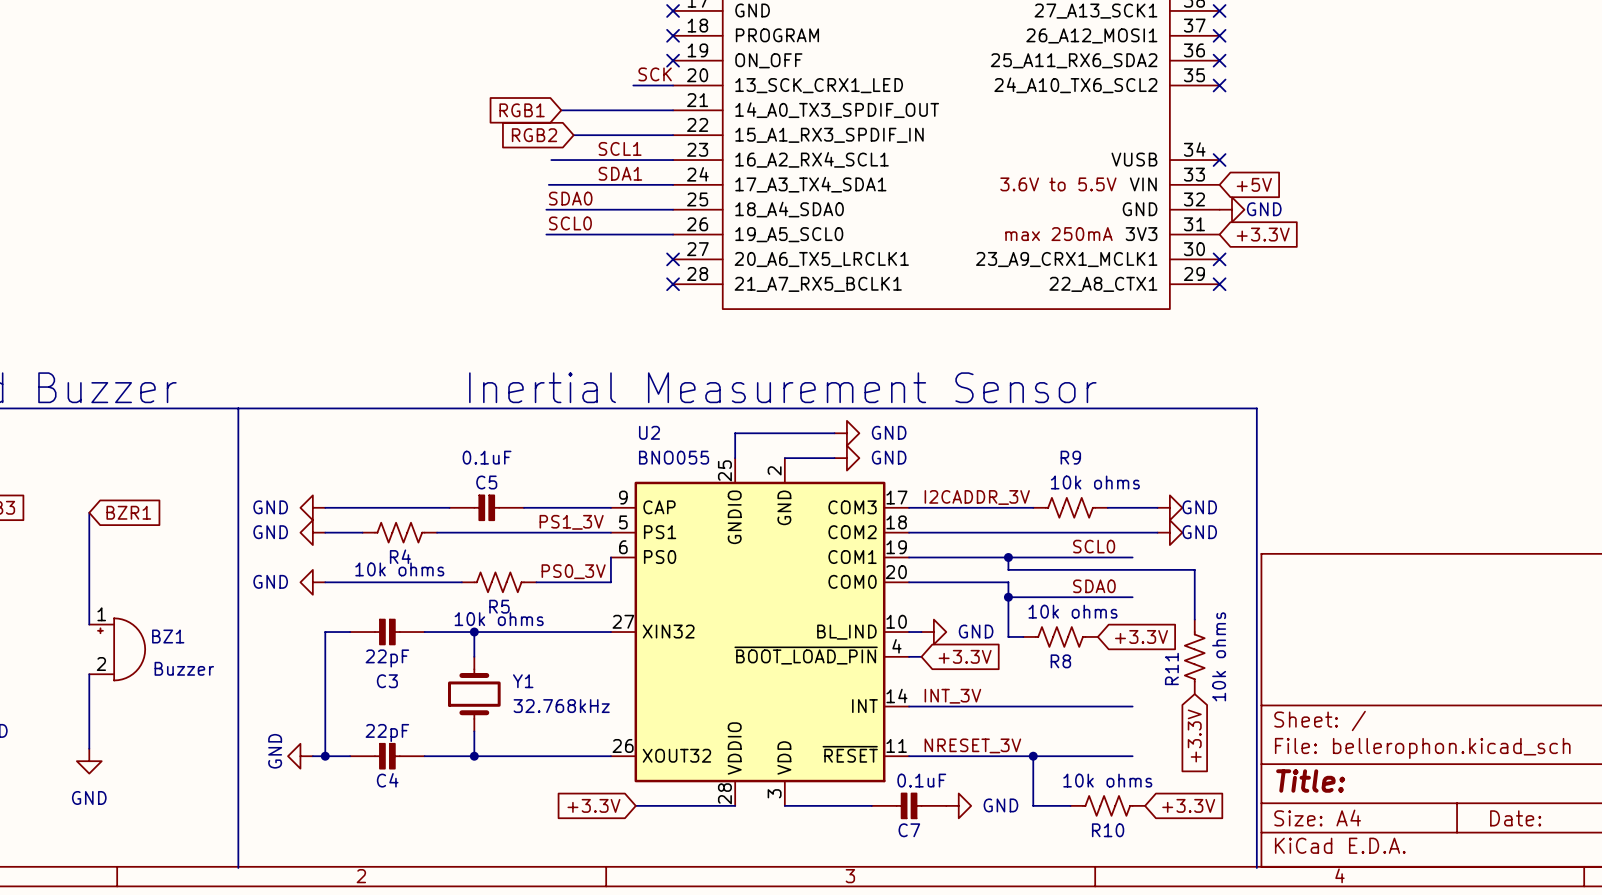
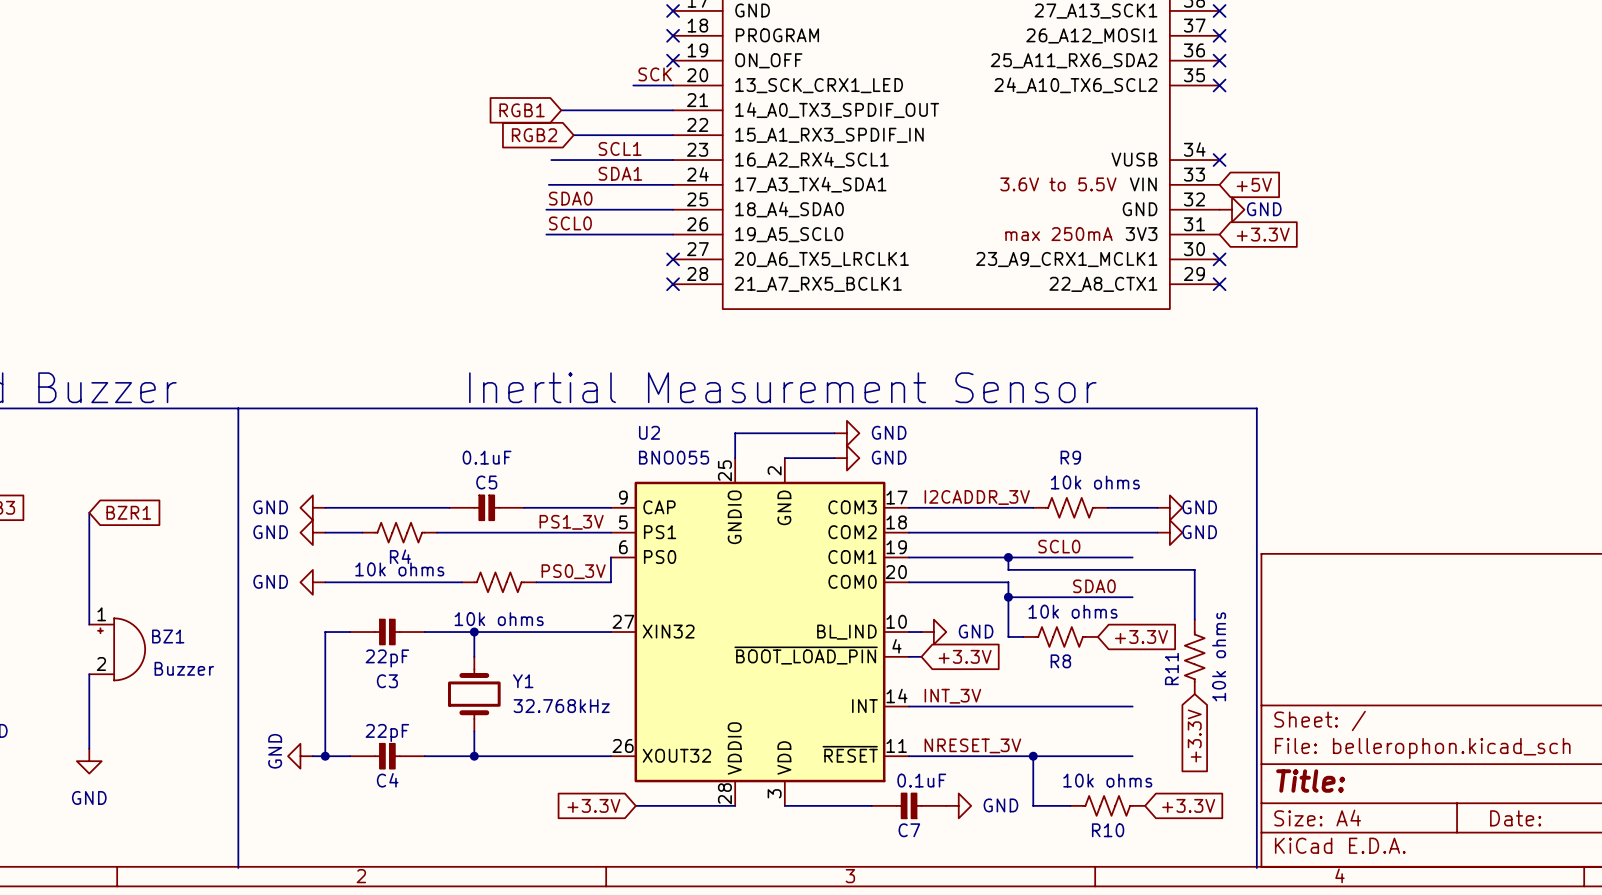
label position: SCL0 (1094, 546) -> SCL0 (1059, 546)
R5 name: R5 (499, 606) -> none

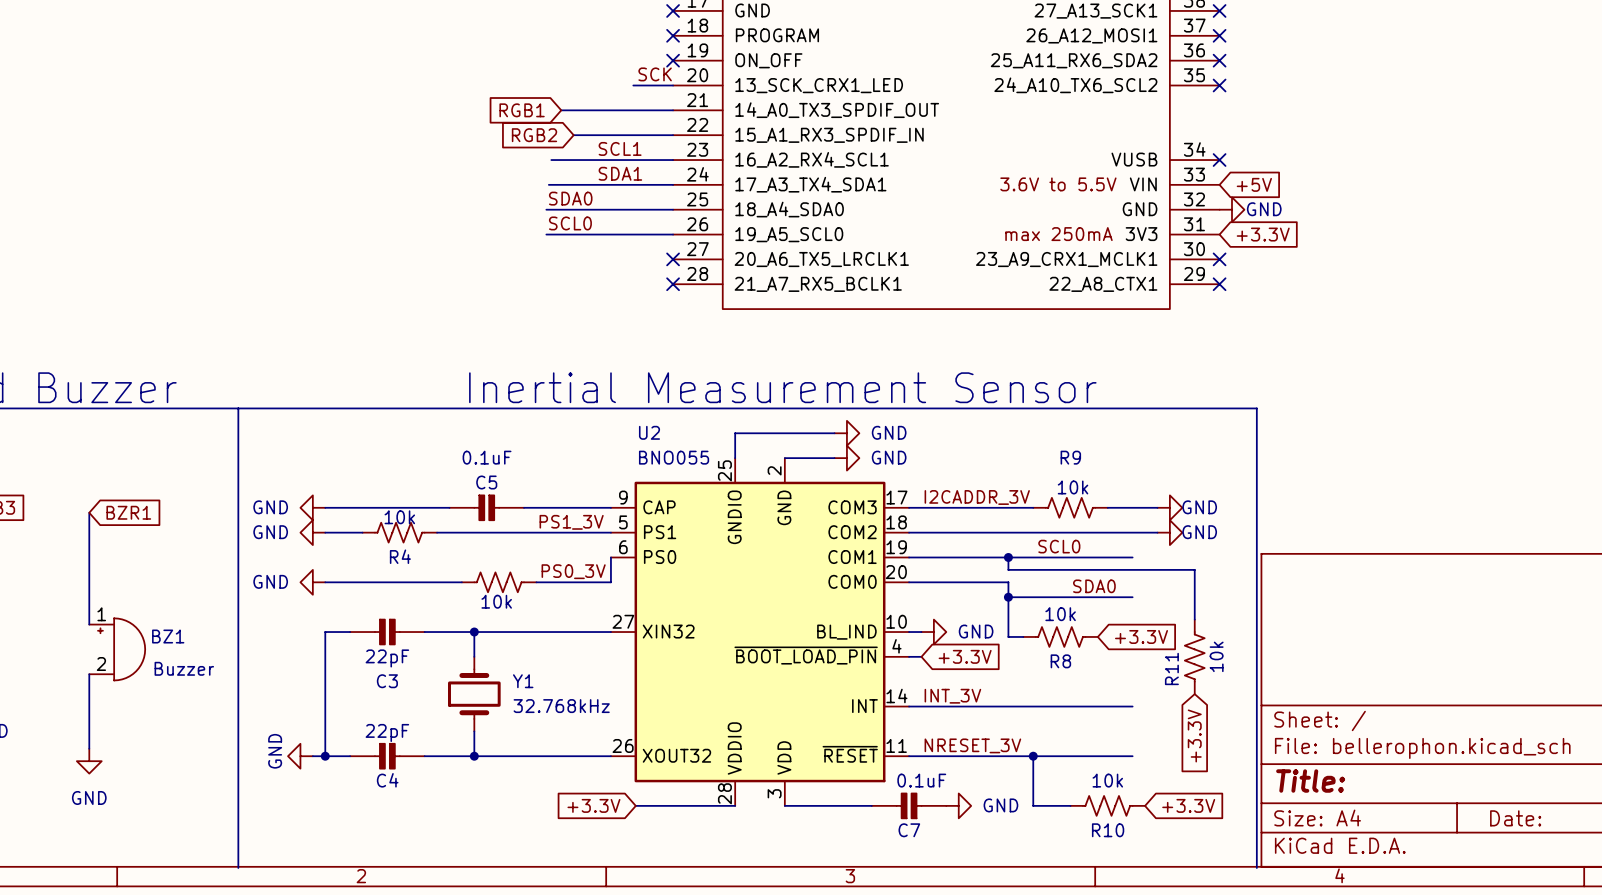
R9 value: 10k ohms (1095, 482) -> 10k (1073, 487)
R4 value: 10k ohms (399, 569) -> 10k (399, 517)
R8 value: 10k ohms (1073, 611) -> 10k (1060, 614)
part value: 10k ohms (499, 619) -> 10k (496, 601)
R11 value: 10k ohms (1219, 656) -> 10k (1216, 656)
R10 value: 10k ohms (1107, 780) -> 10k (1107, 780)

